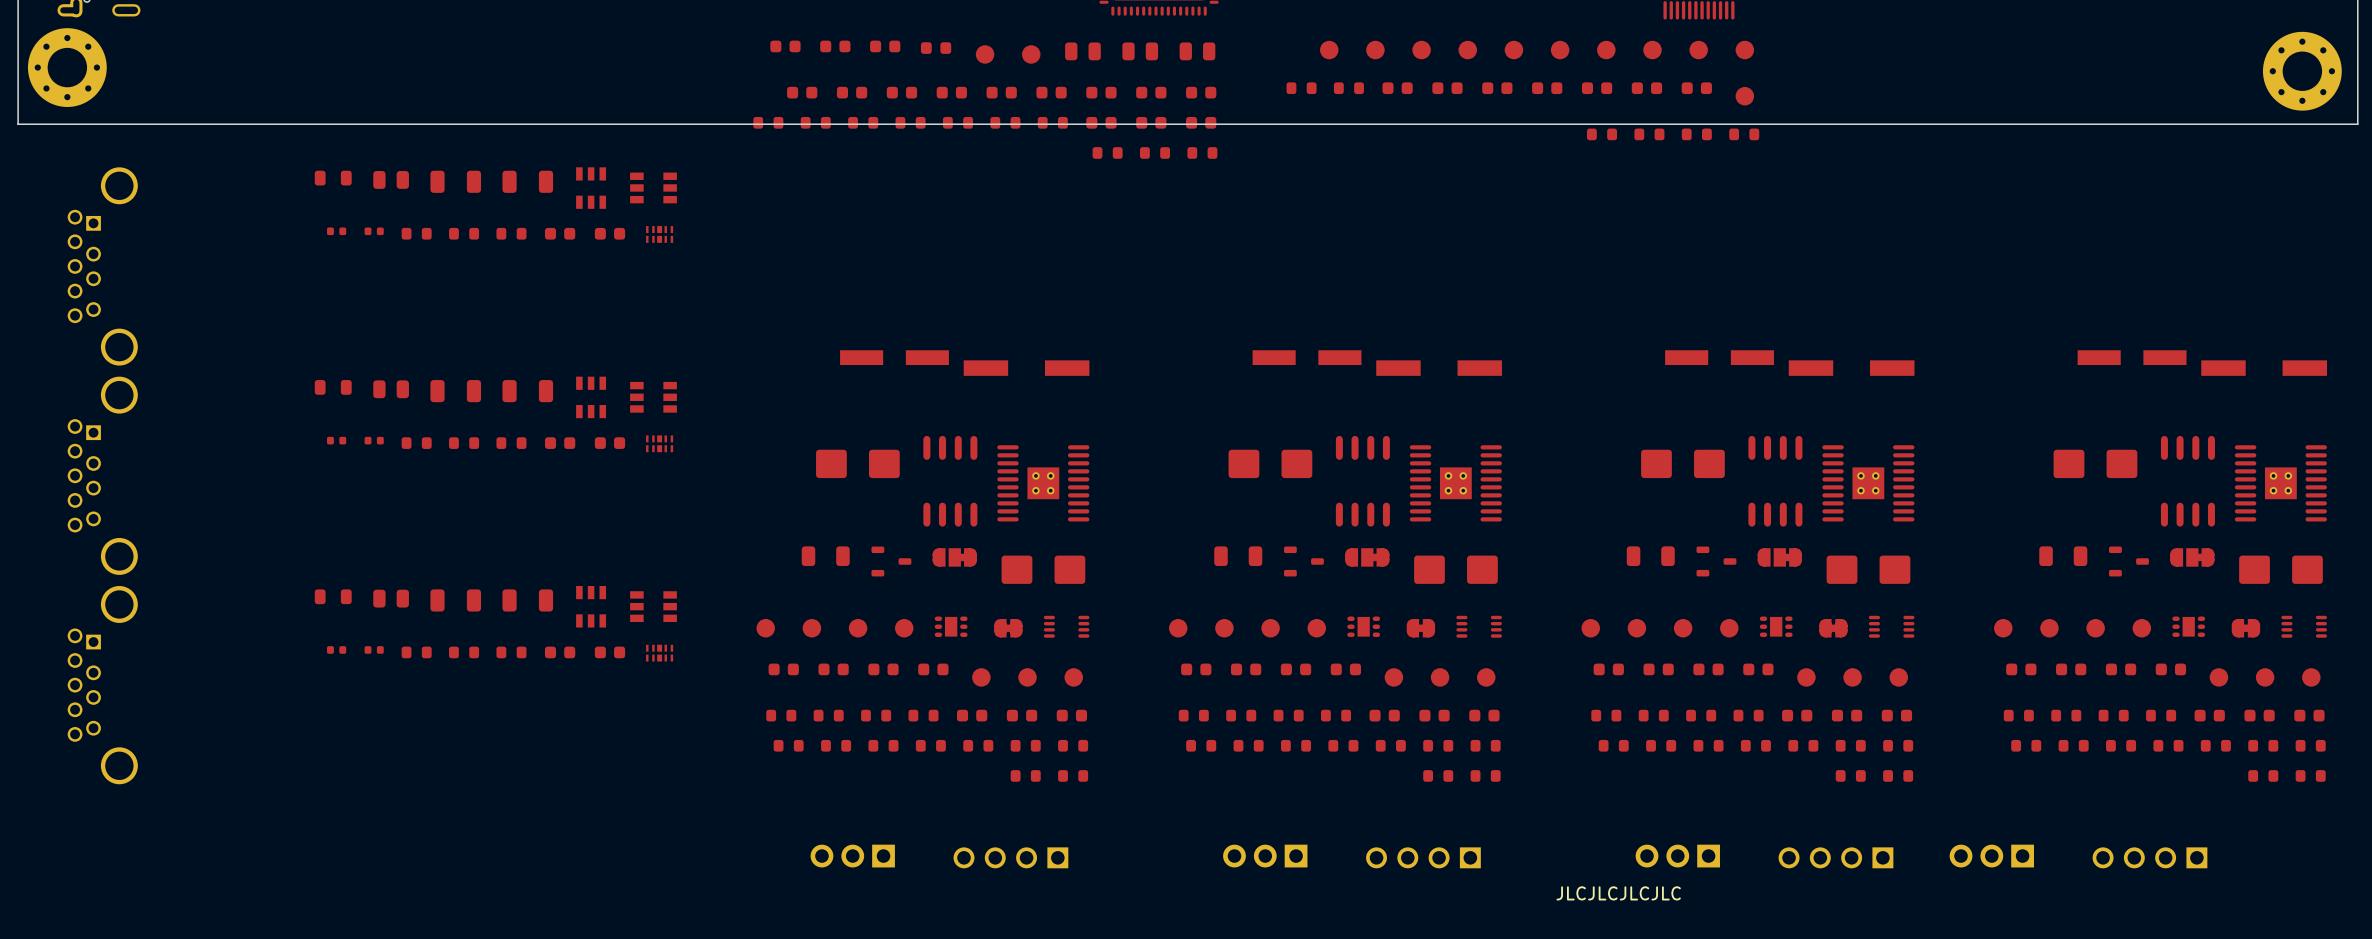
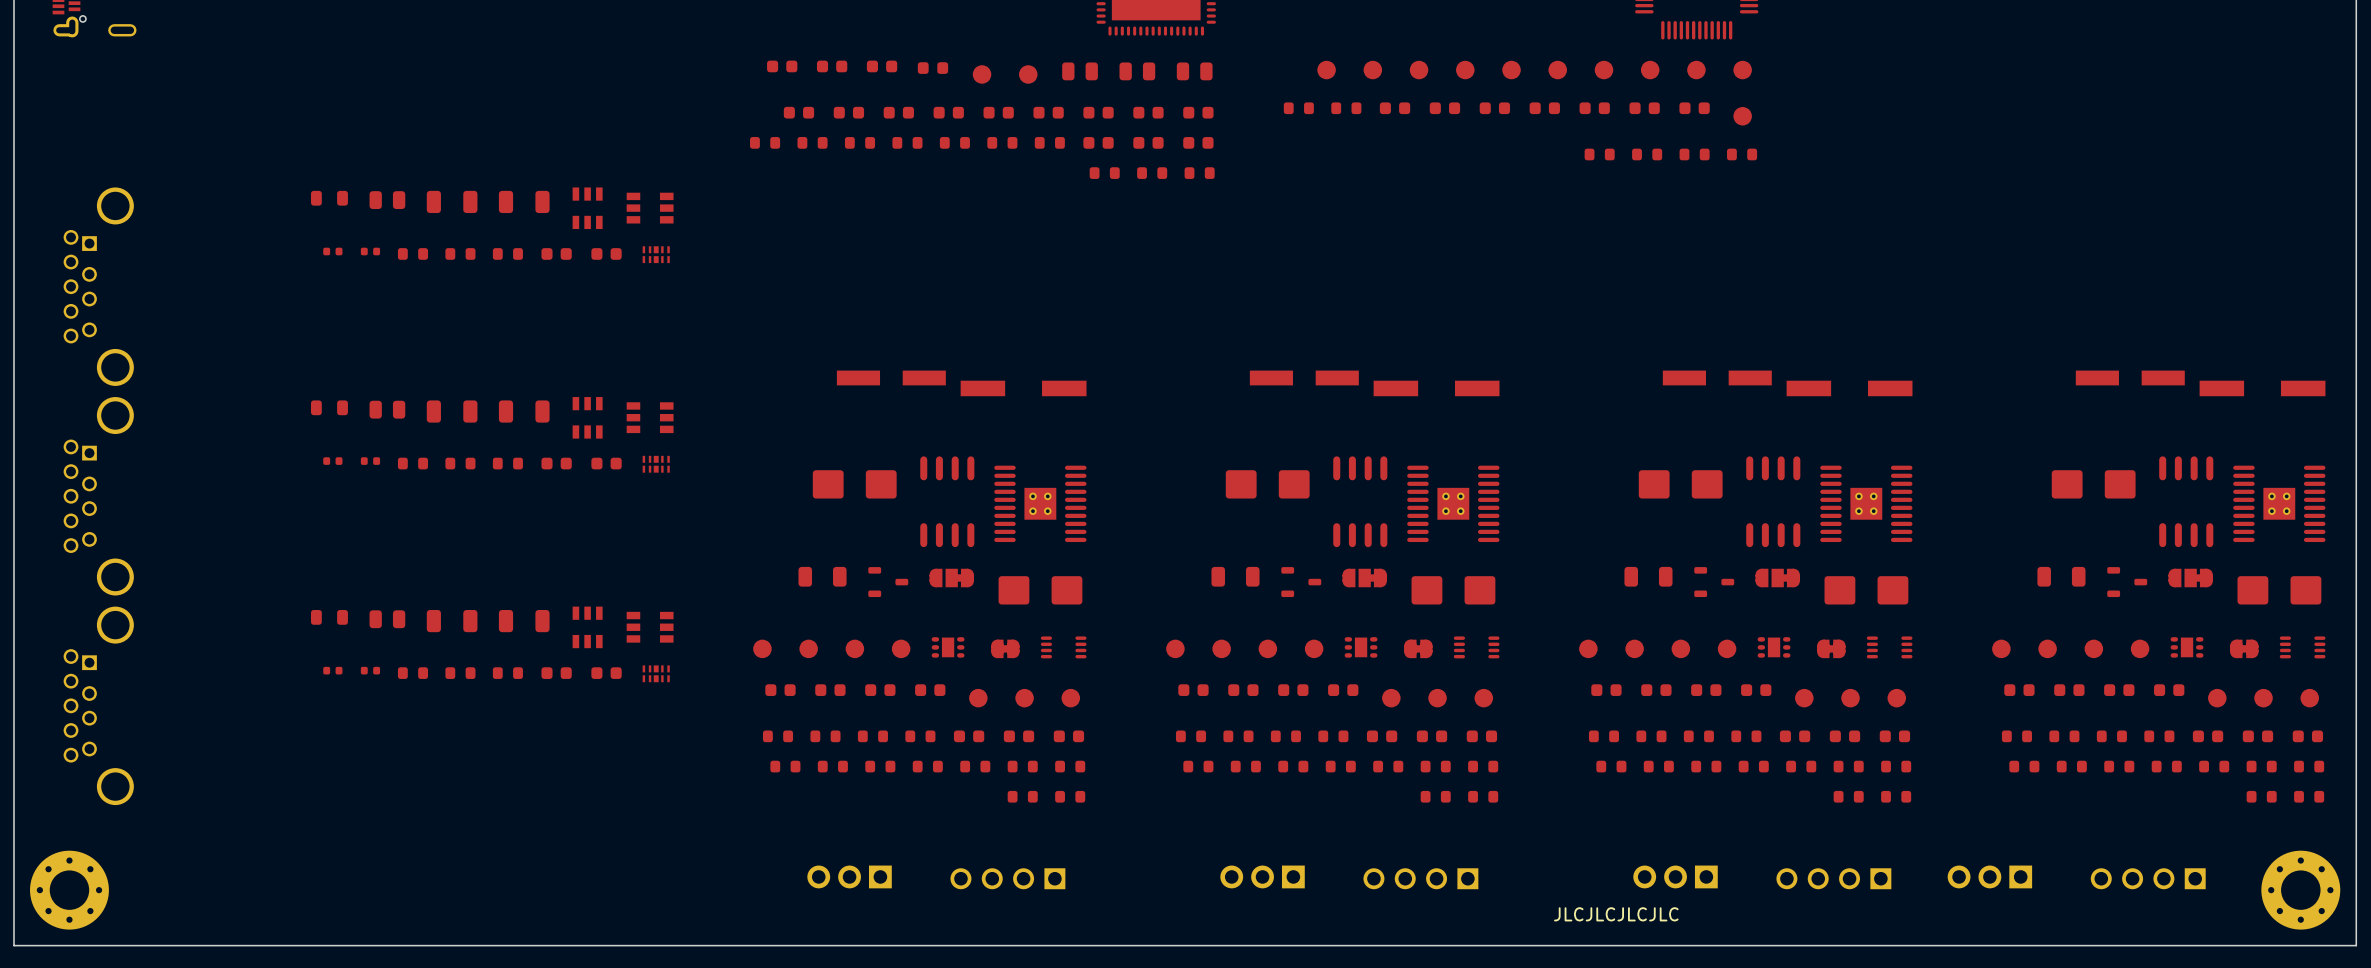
part: (67, 67) -> none
part: (2302, 71) -> none
board edge: (2357, 124) (18, 124) -> (2356, 144) (2356, 945) (13, 945) (13, 144)
part: none -> (69, 890)
part: none -> (2300, 890)

